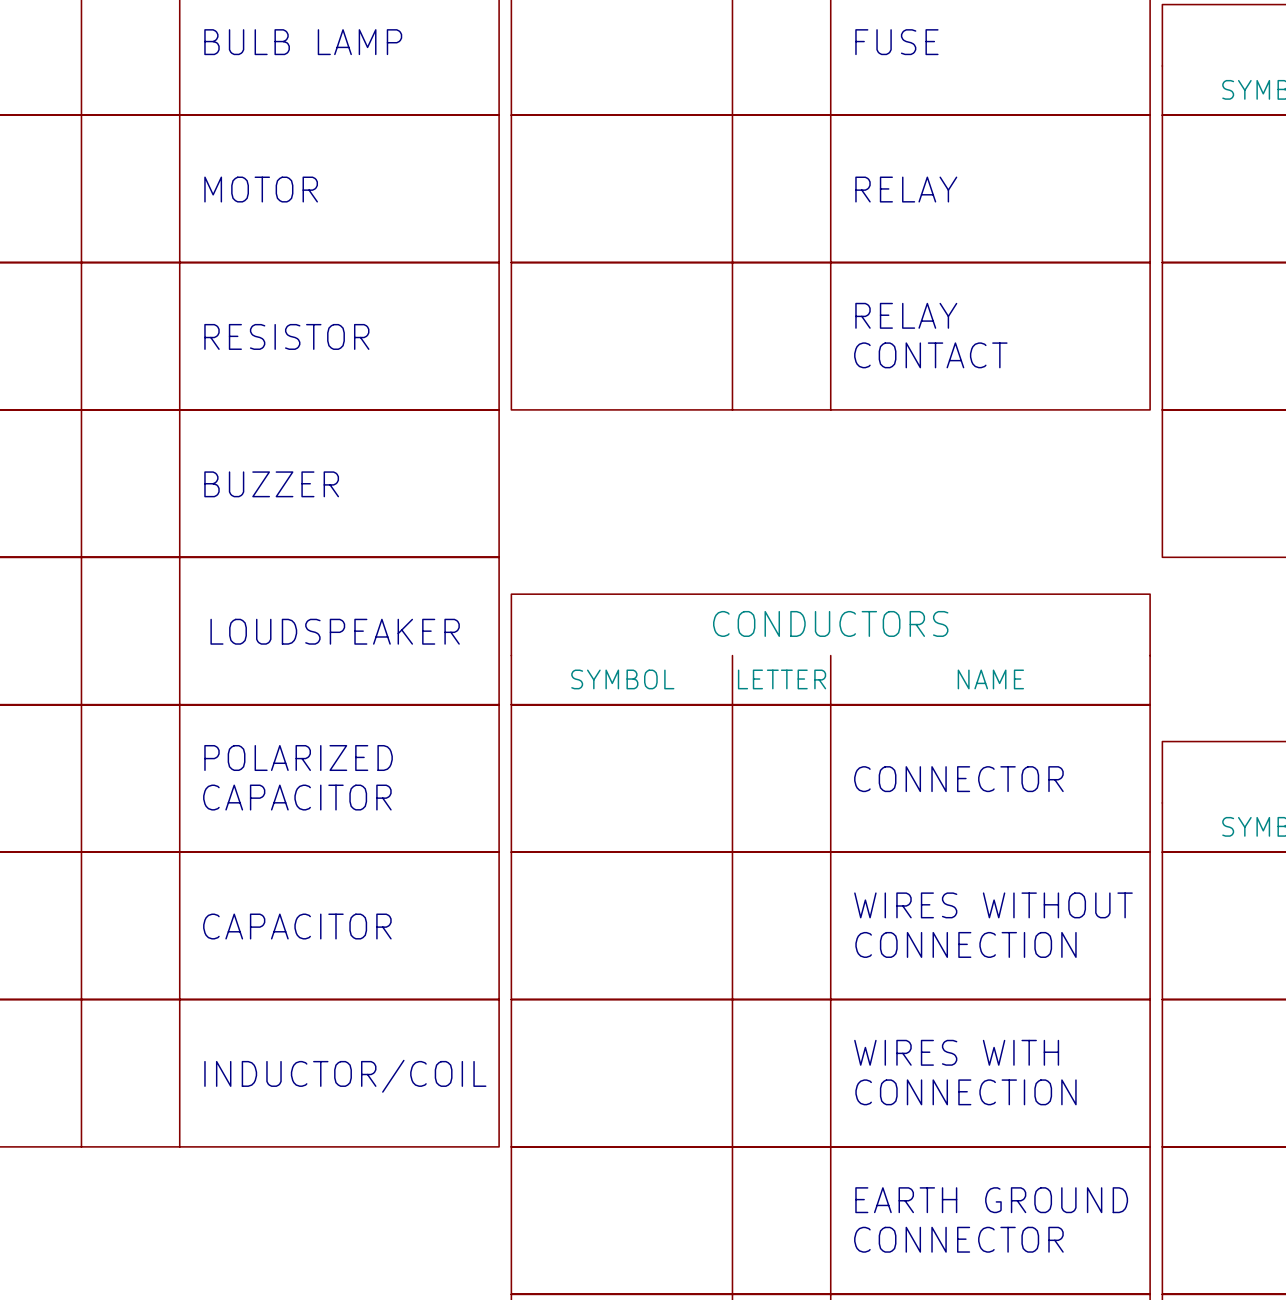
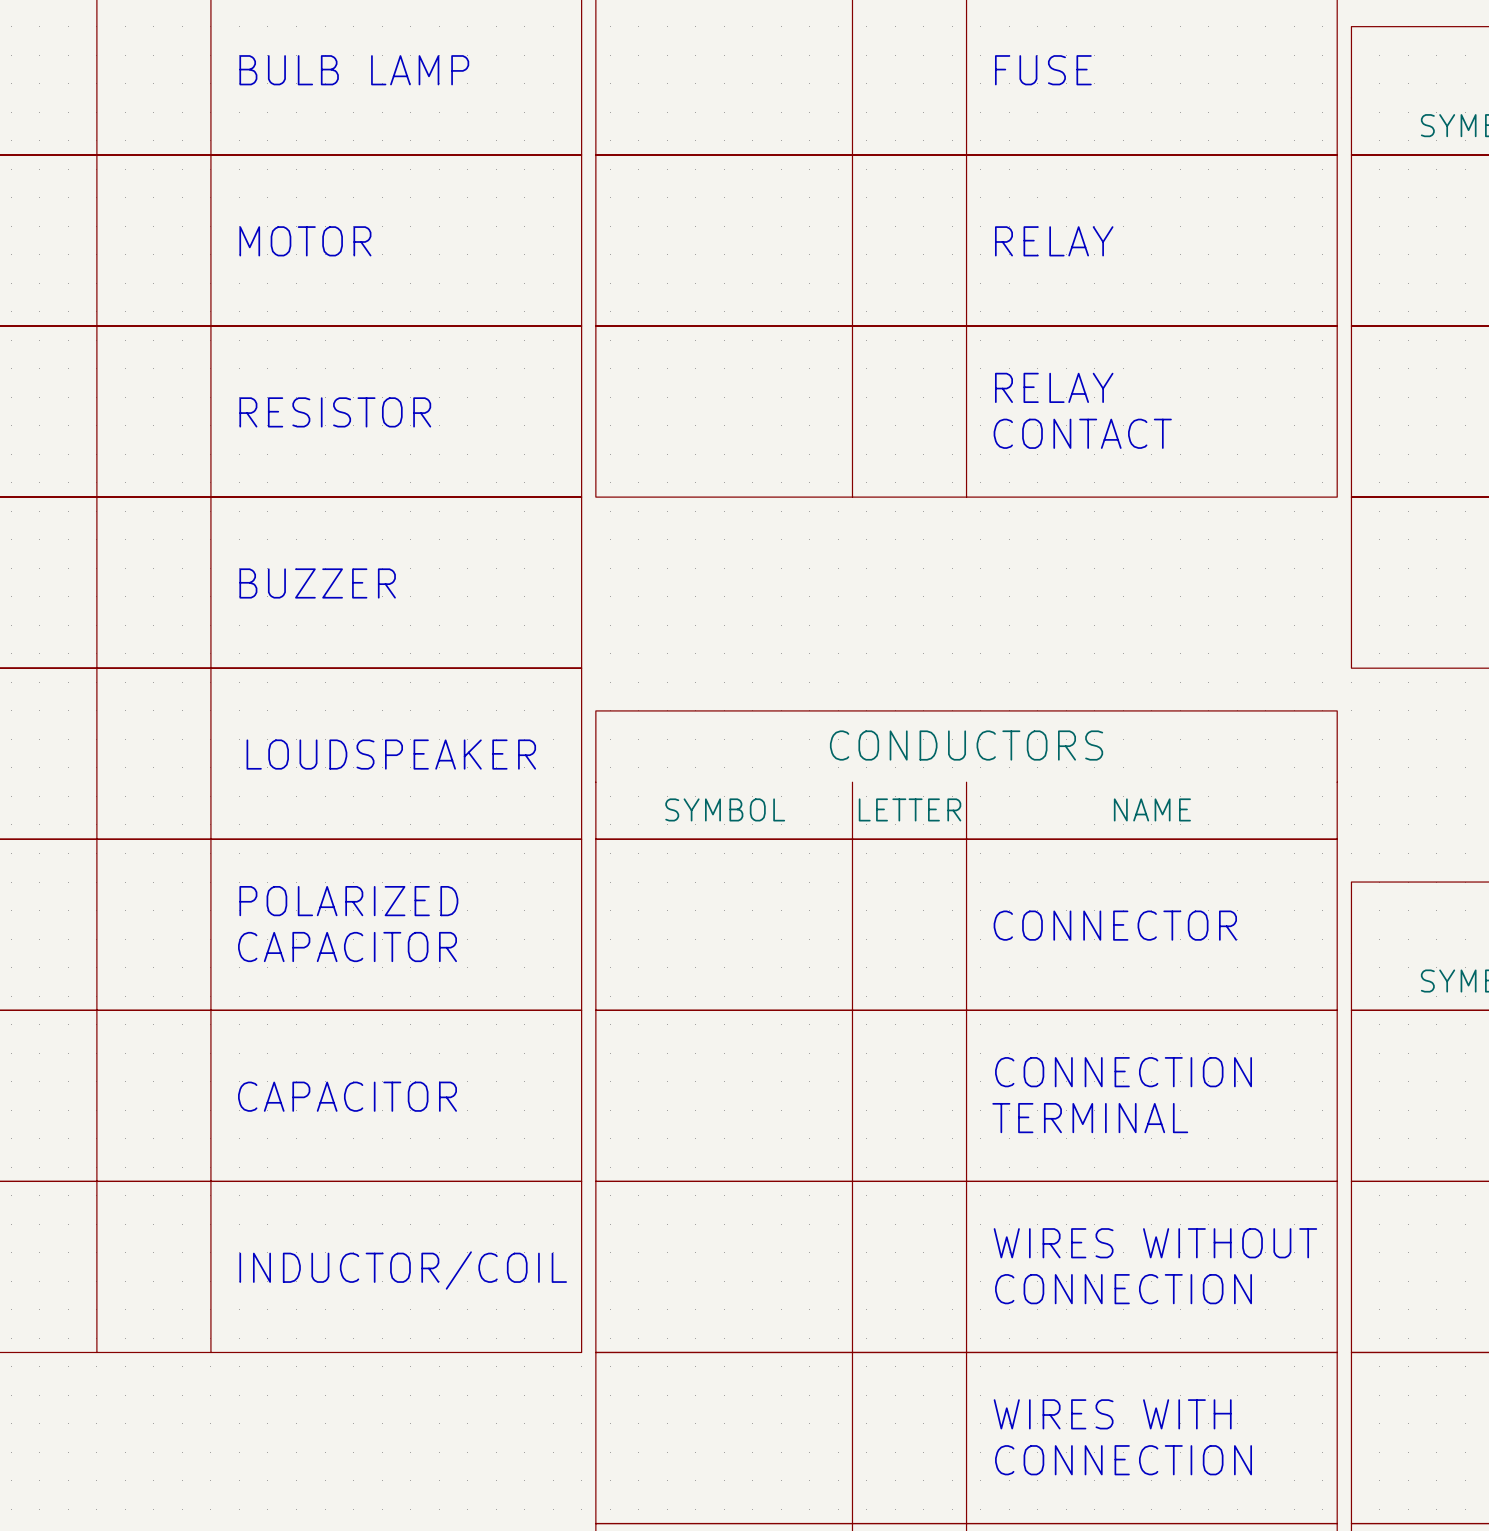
text: WIRES WITHOUT (993, 905) -> CONNECTION (1123, 1072)
text: CONNECTION (966, 944) -> TERMINAL (1090, 1118)
text: WIRES WITH (956, 1052) -> WIRES WITHOUT (1155, 1243)
text: EARTH GROUND (991, 1200) -> WIRES WITH (1112, 1414)
text: CONNECTOR (958, 1239) -> CONNECTION (1123, 1460)

